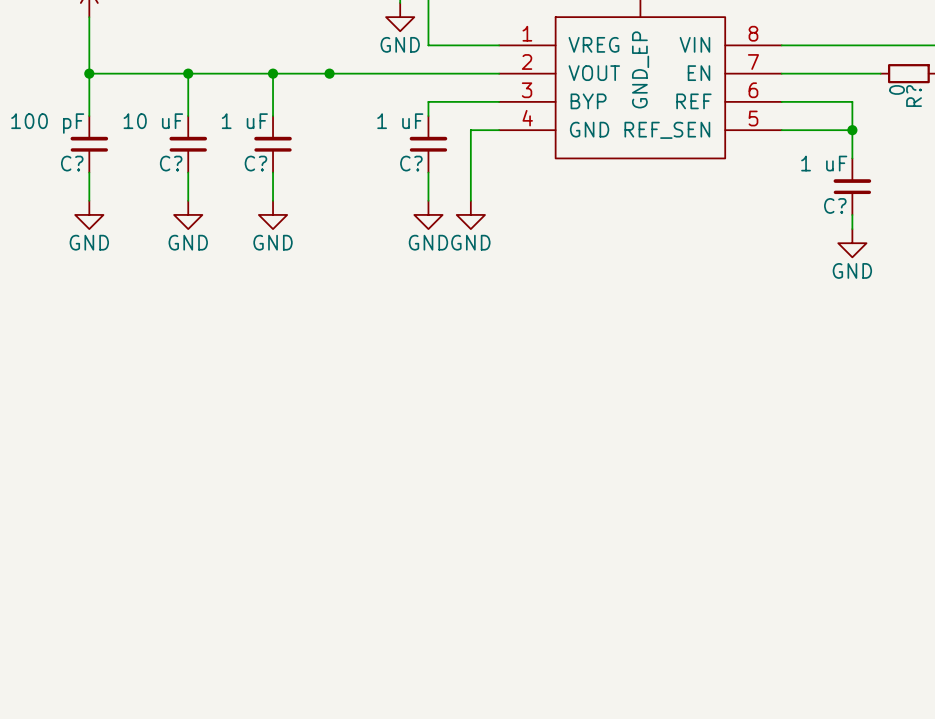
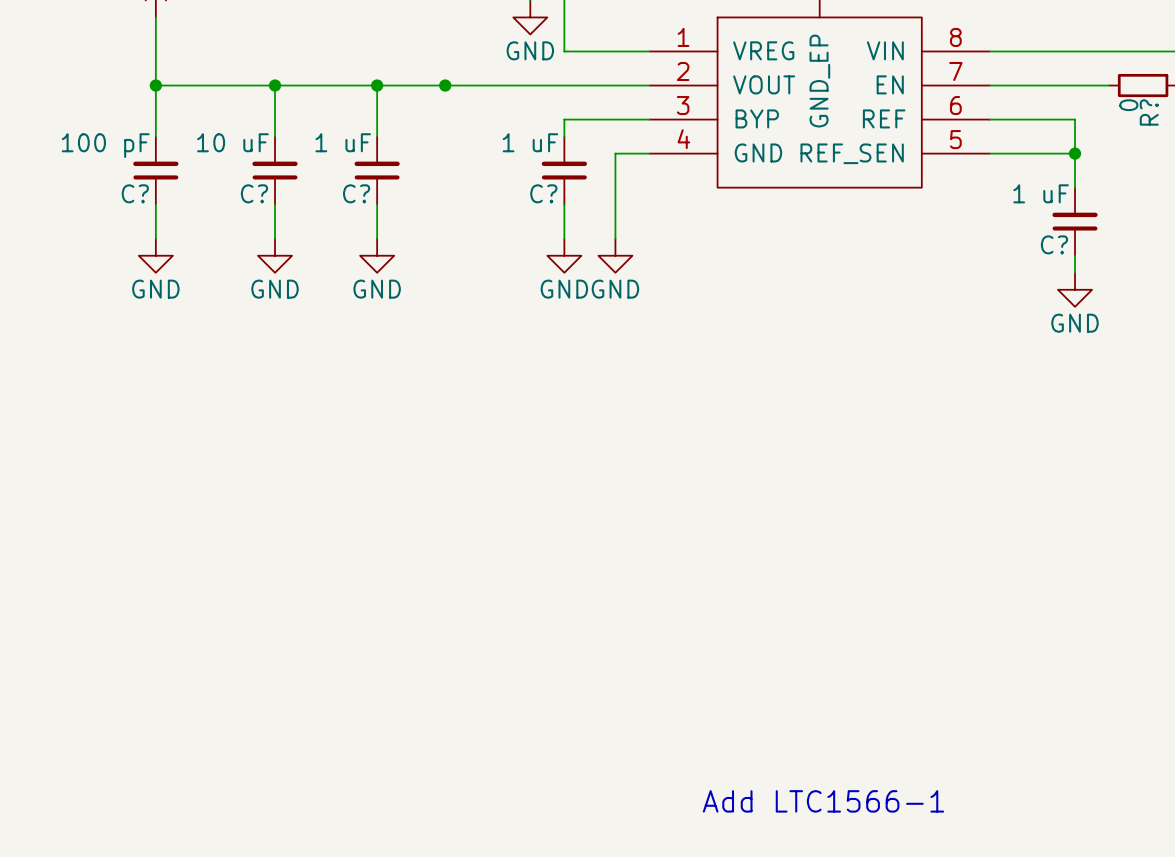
text: none -> Add LTC1566-1 (823, 801)

